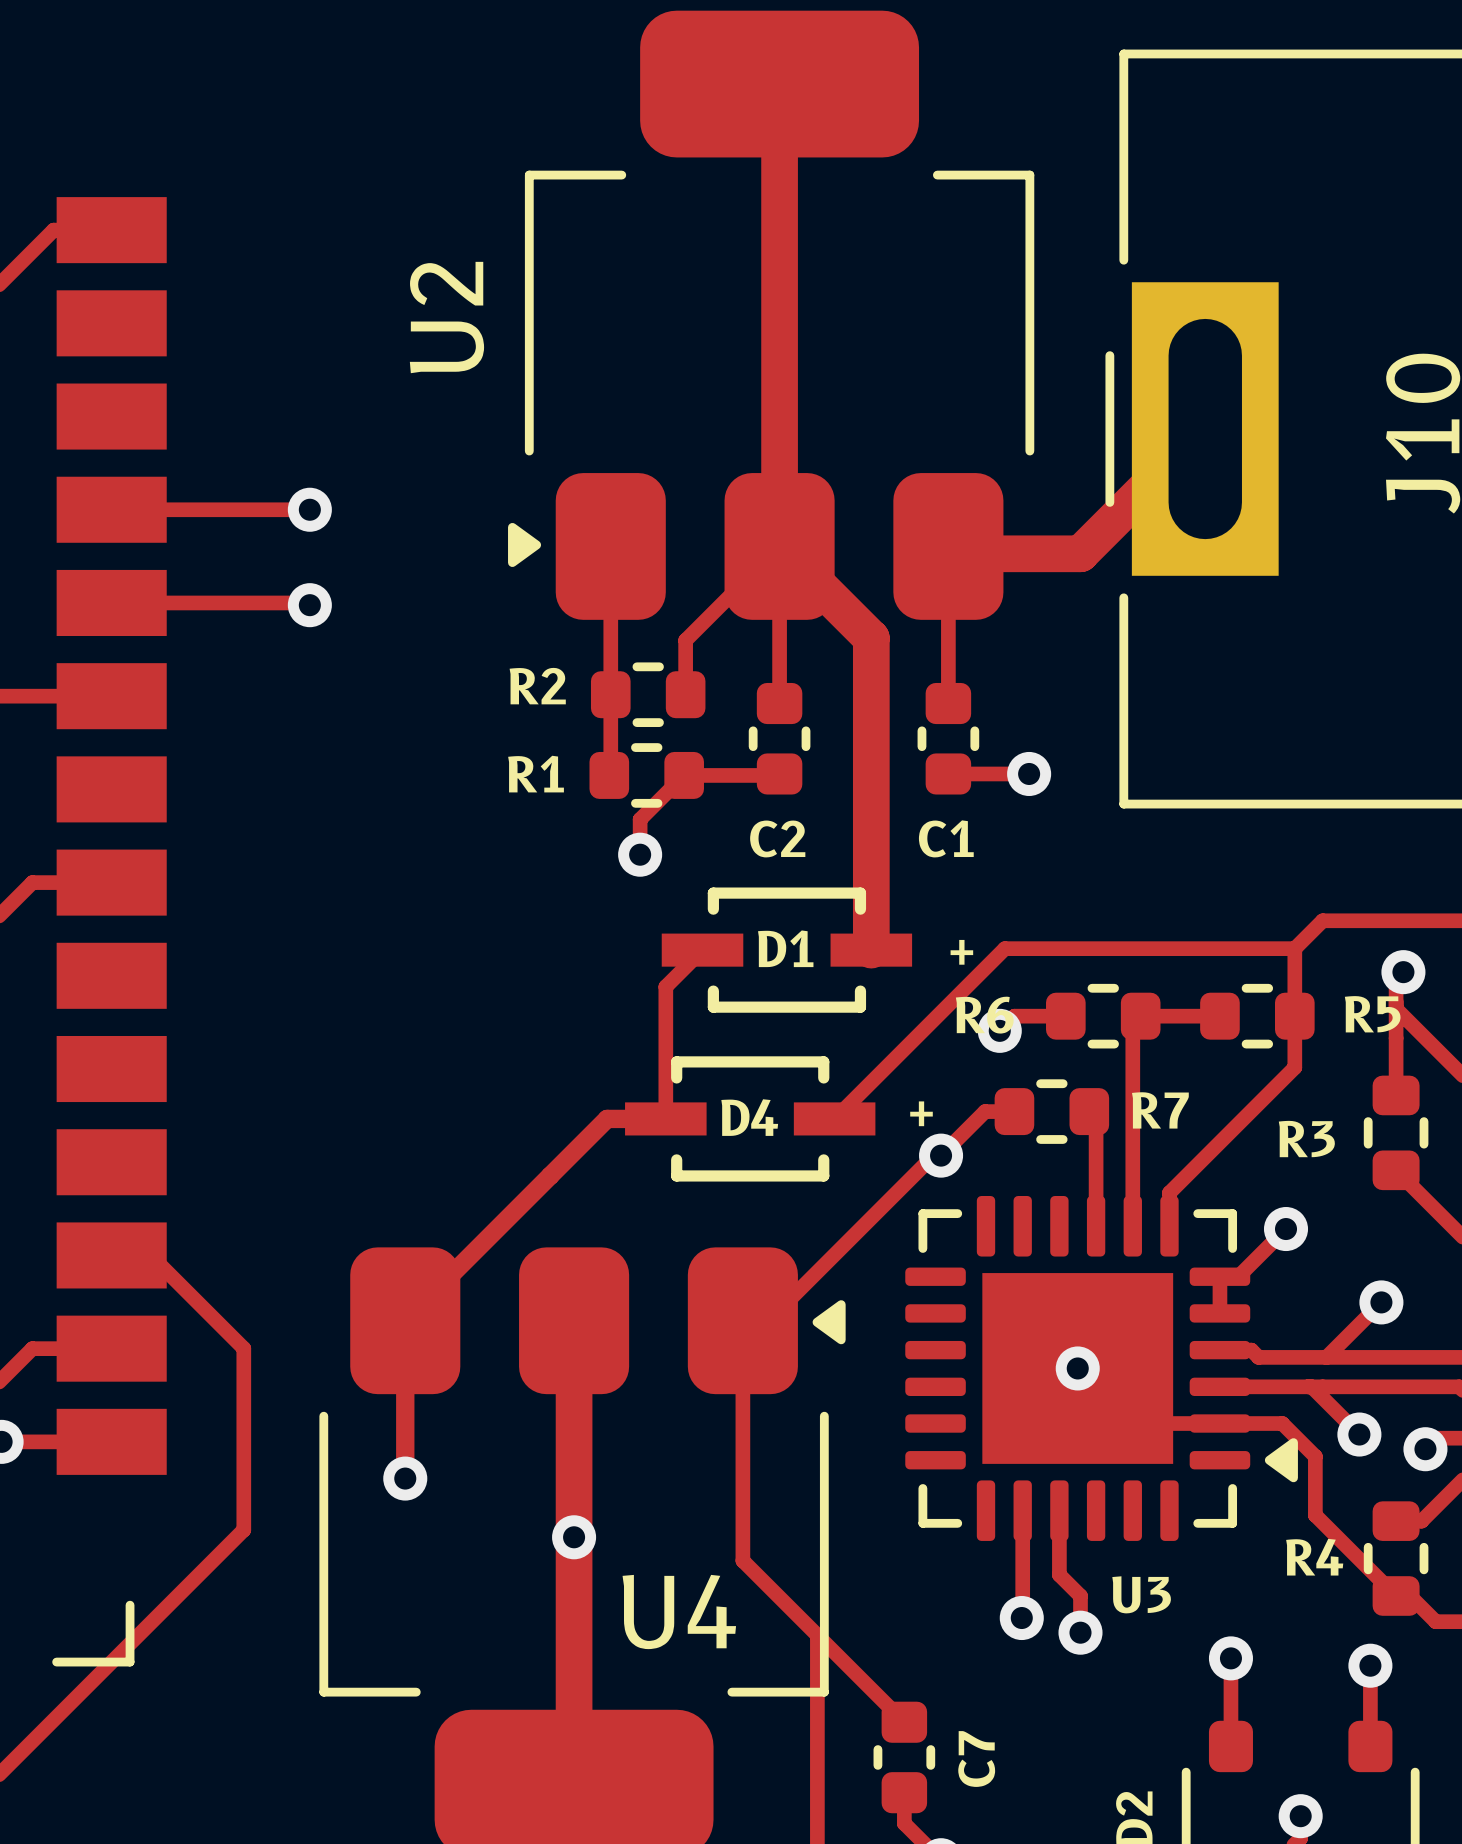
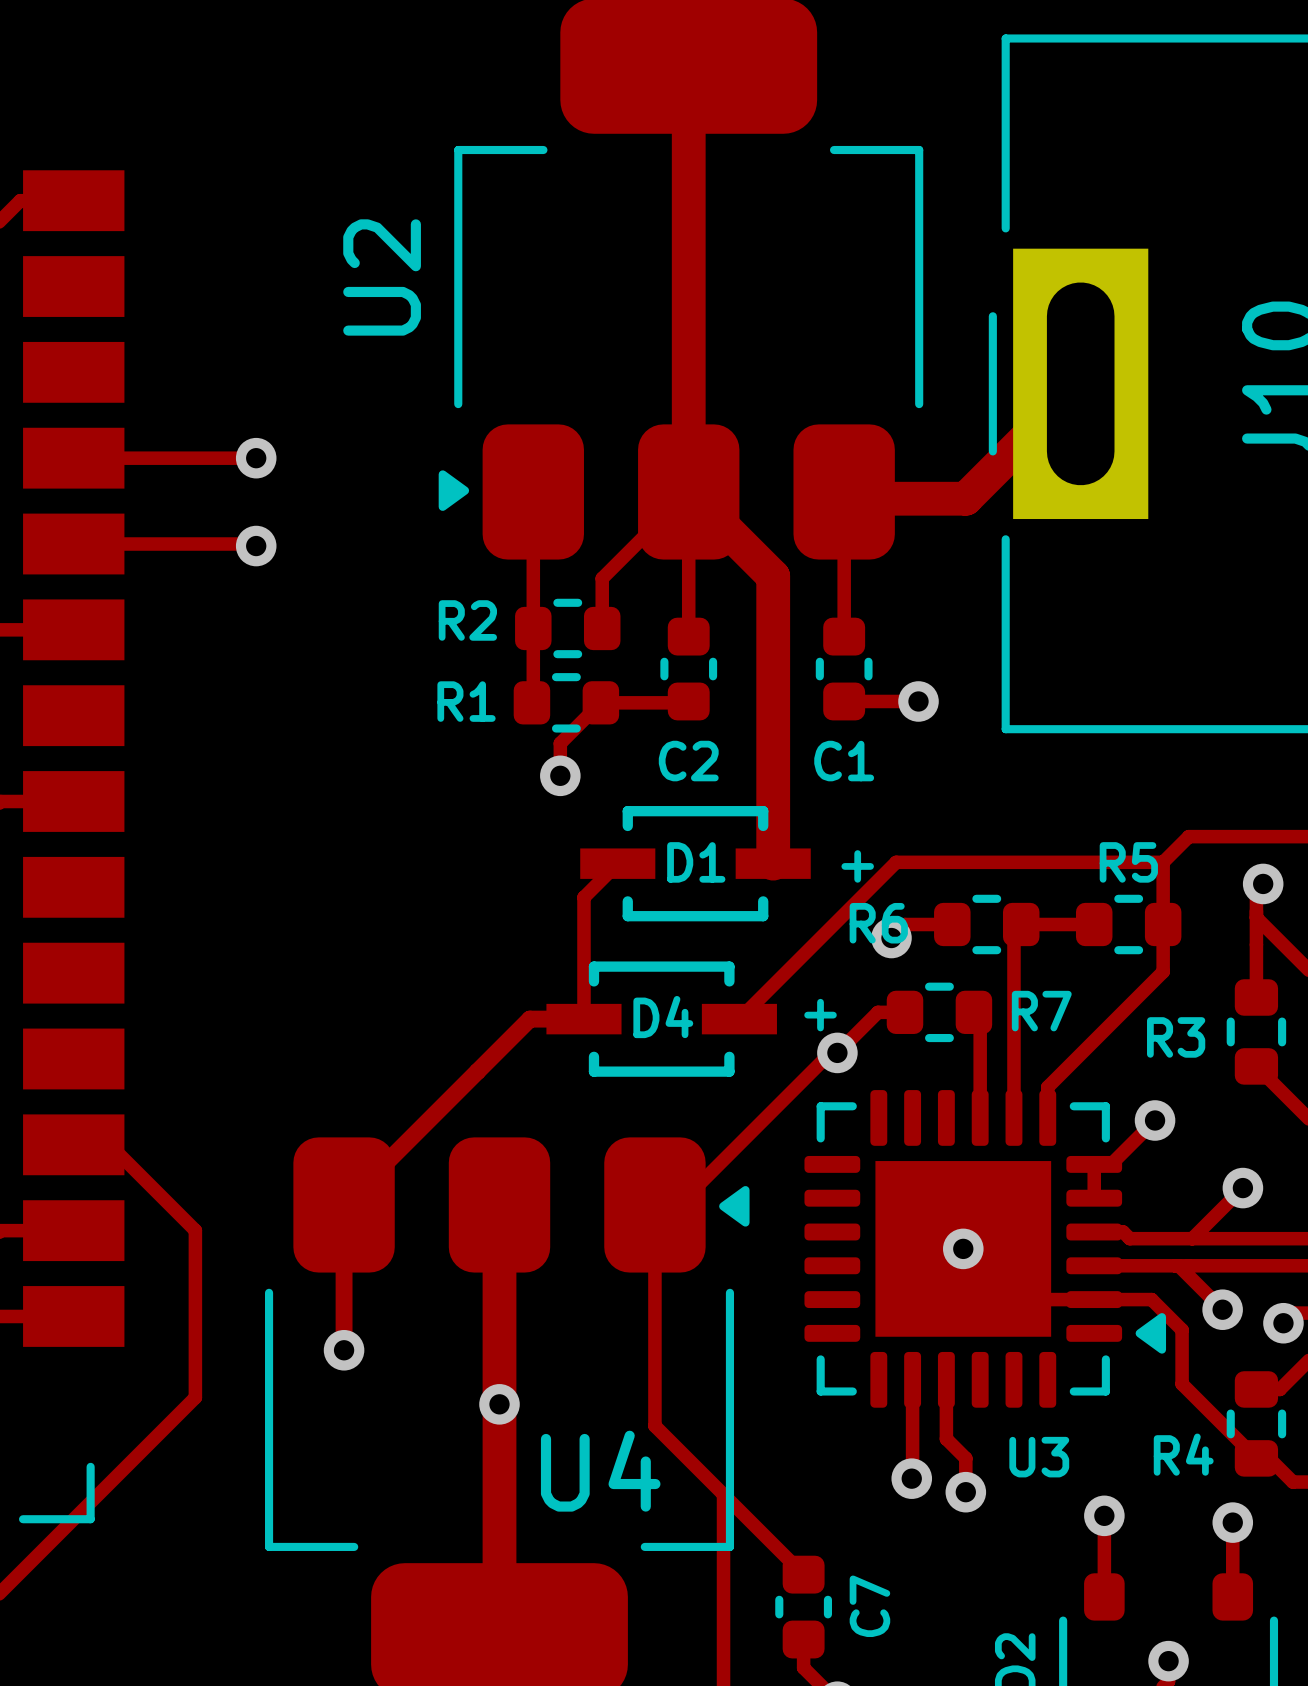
R5 name position: R5 (1372, 1014) -> R5 (1128, 862)
R4 name position: R4 (1314, 1557) -> R4 (1183, 1454)
U3 name position: U3 (1141, 1594) -> U3 (1039, 1457)

